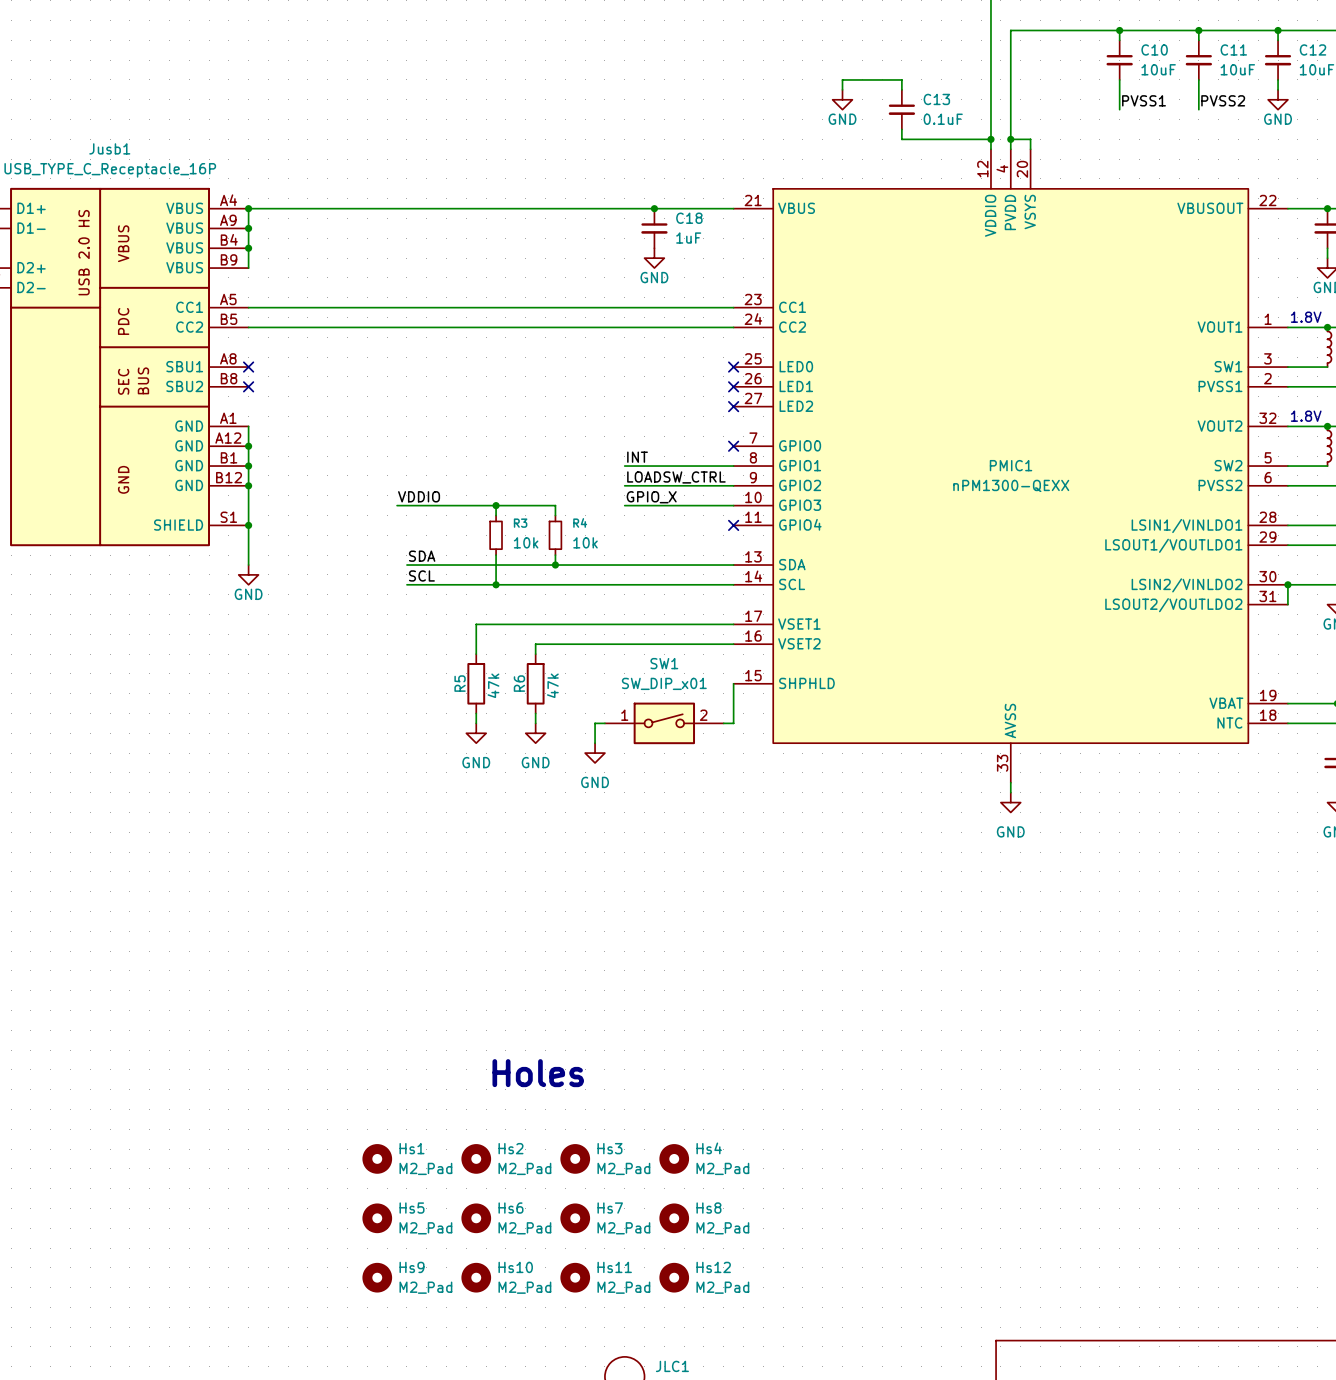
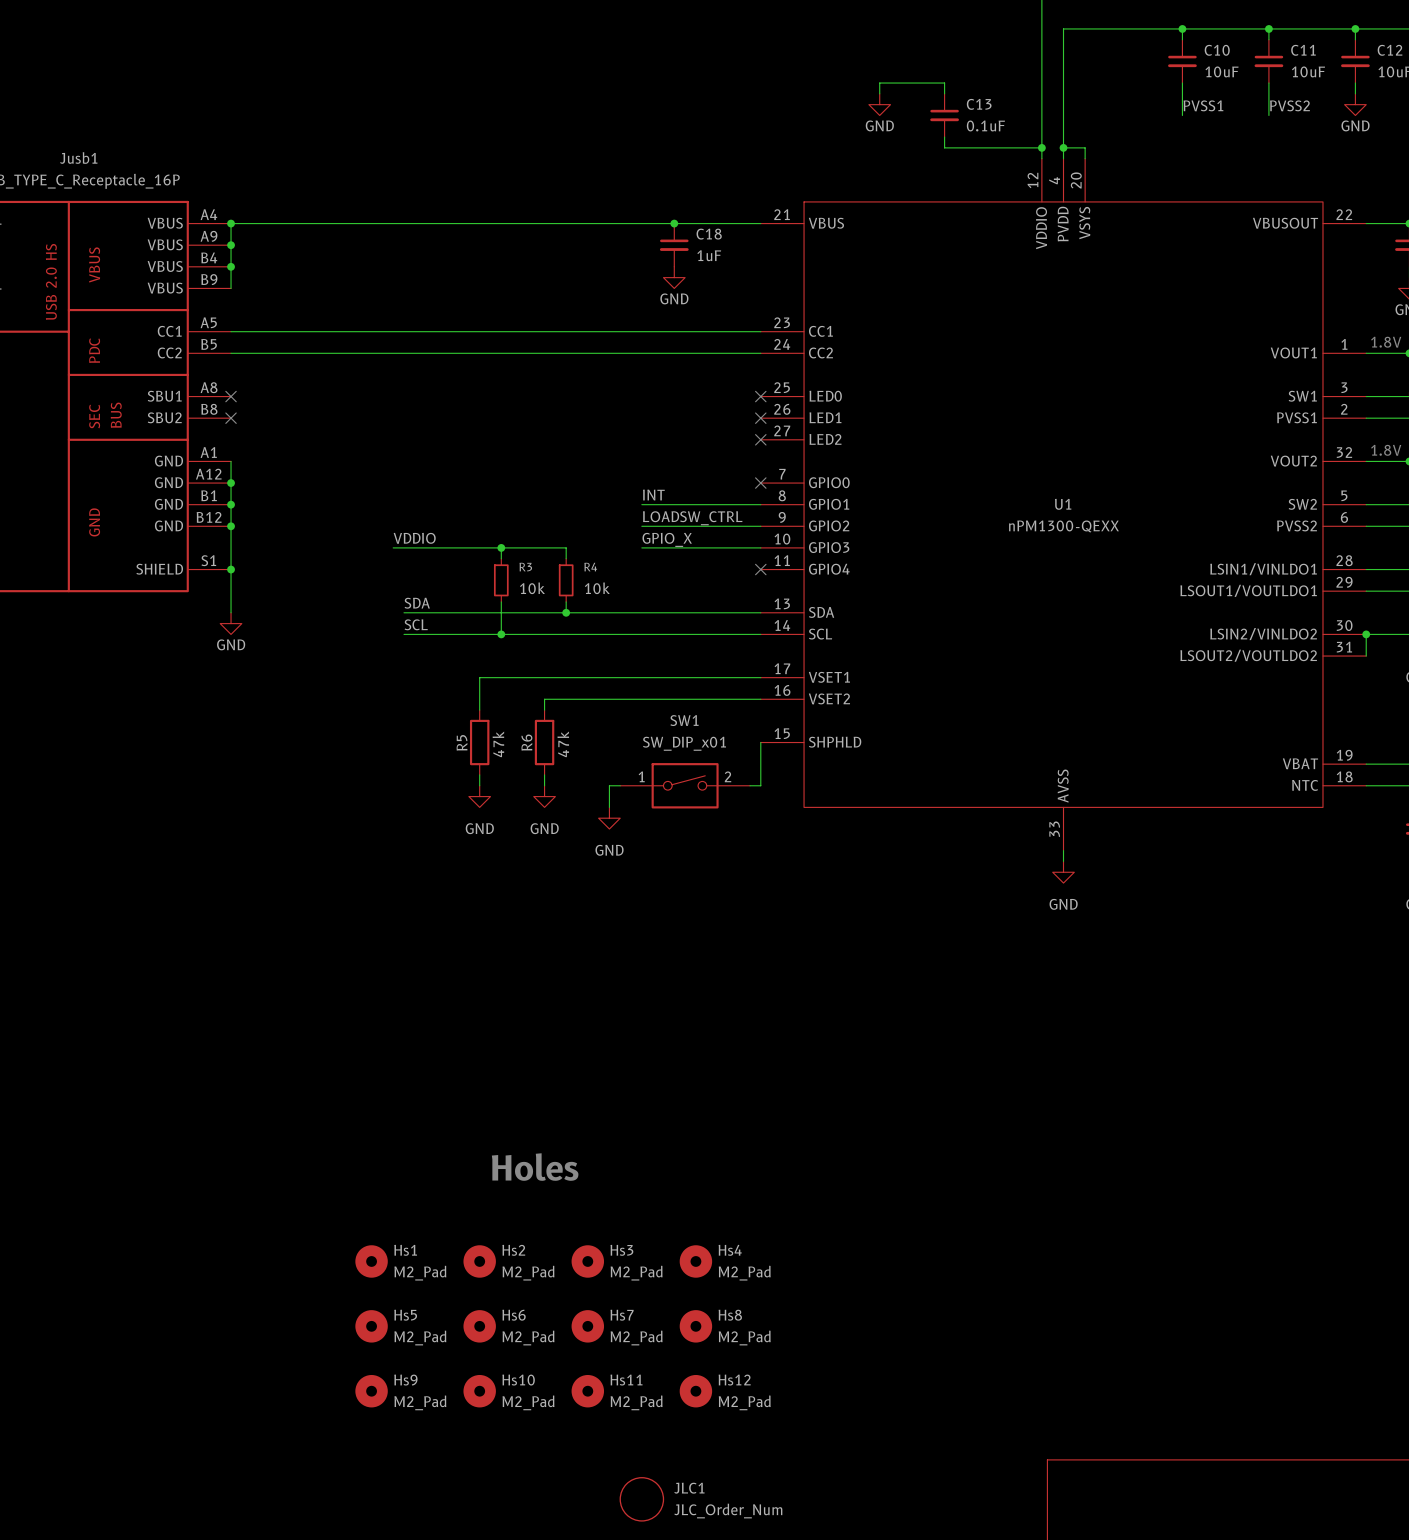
PMIC1 name: PMIC1 (1011, 465) -> U1 (1063, 504)

